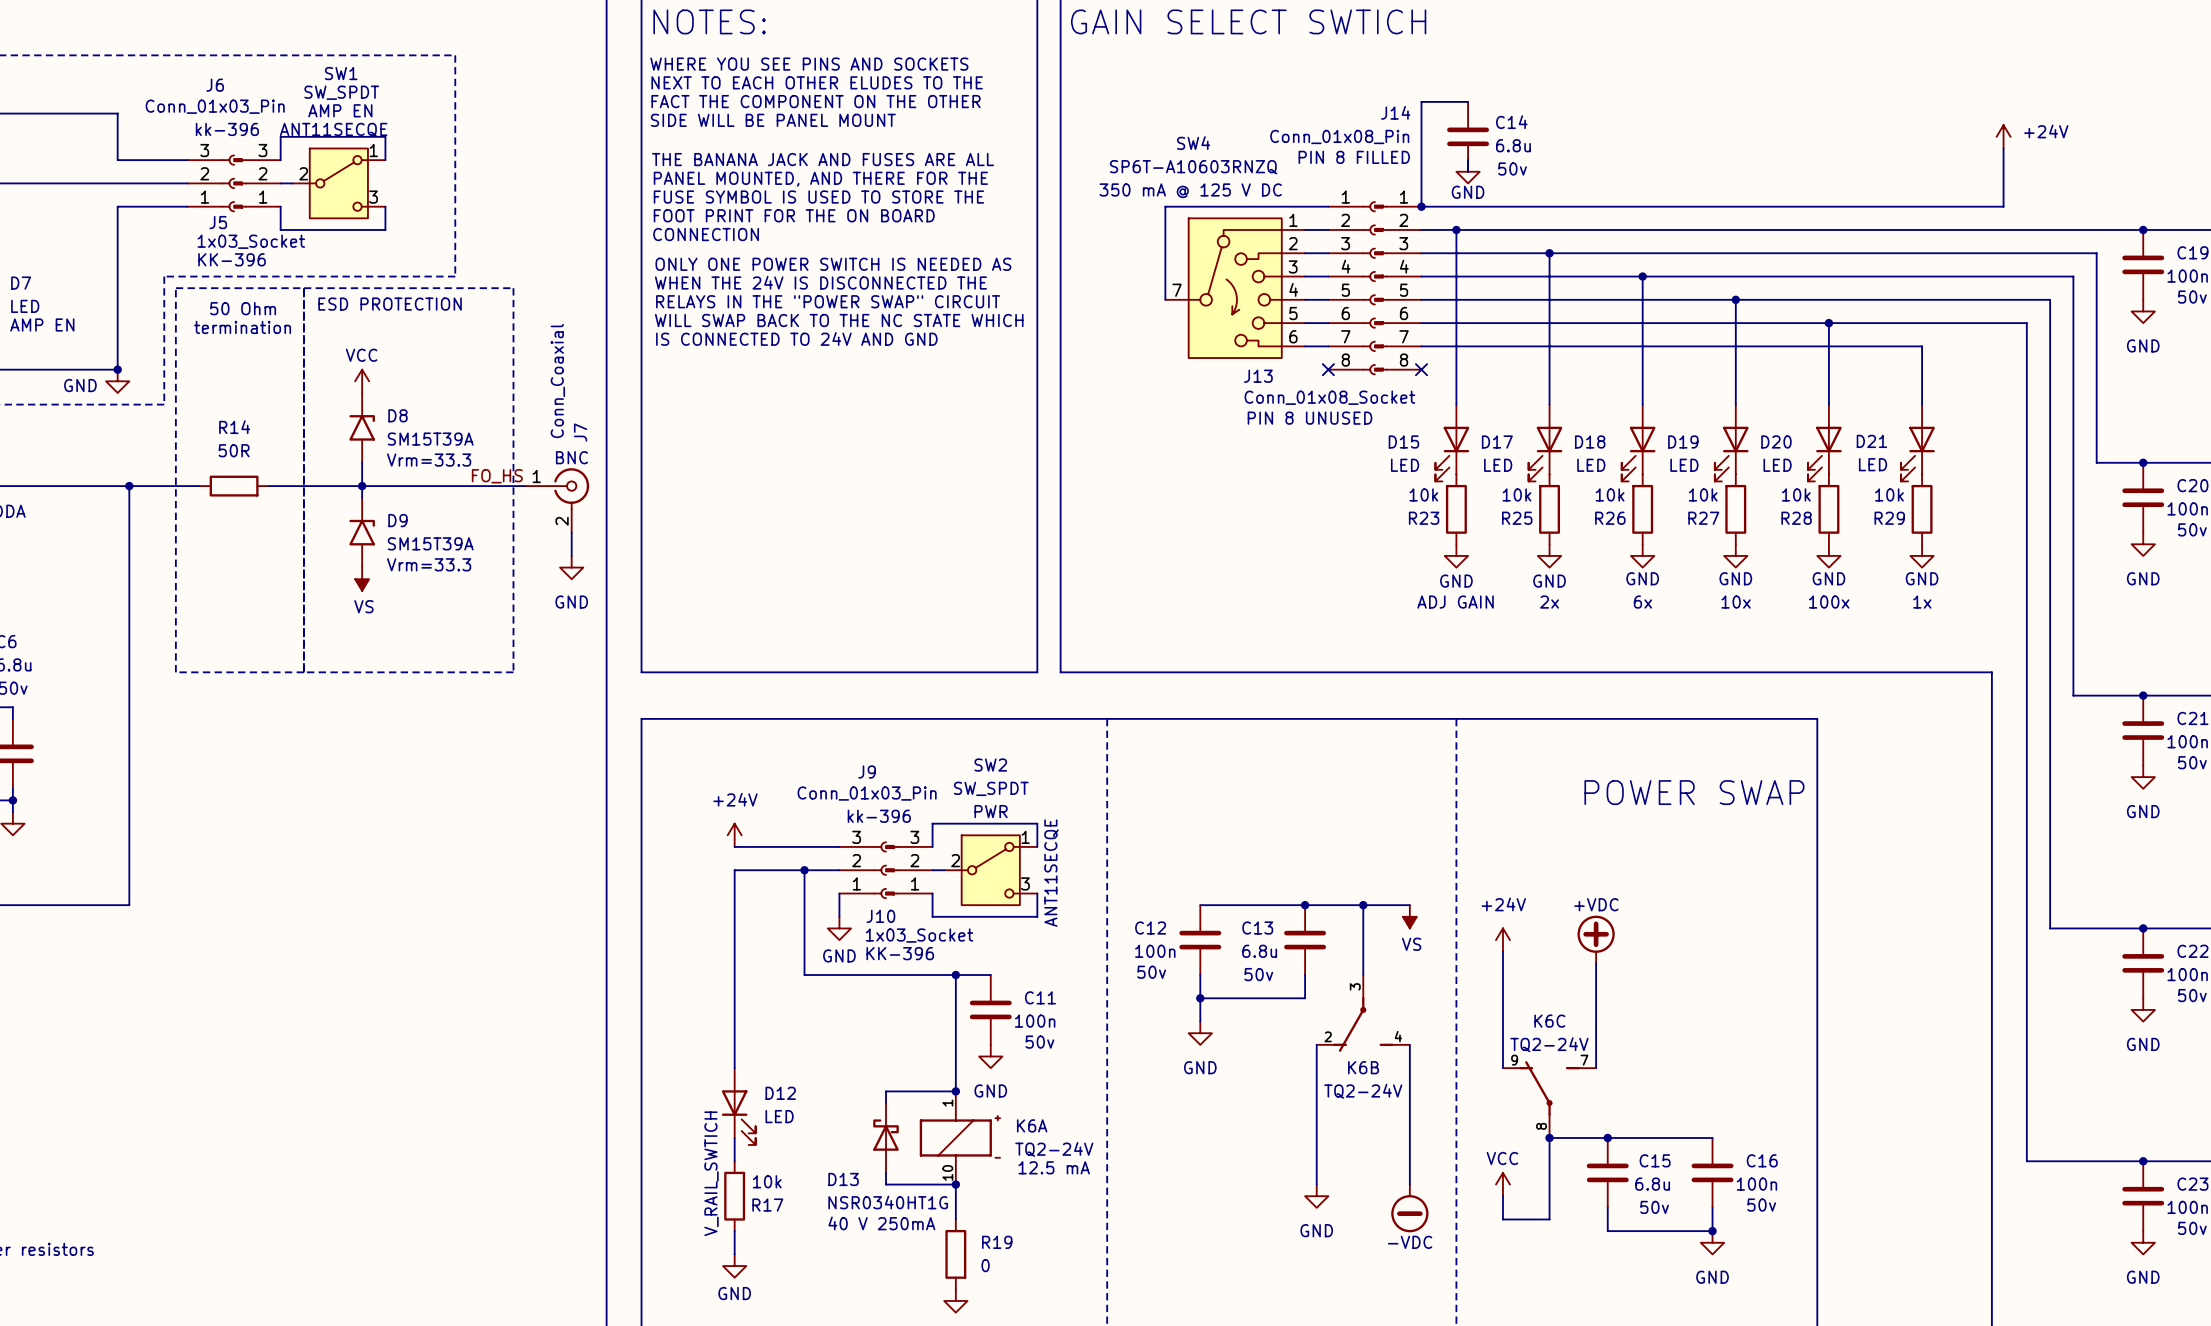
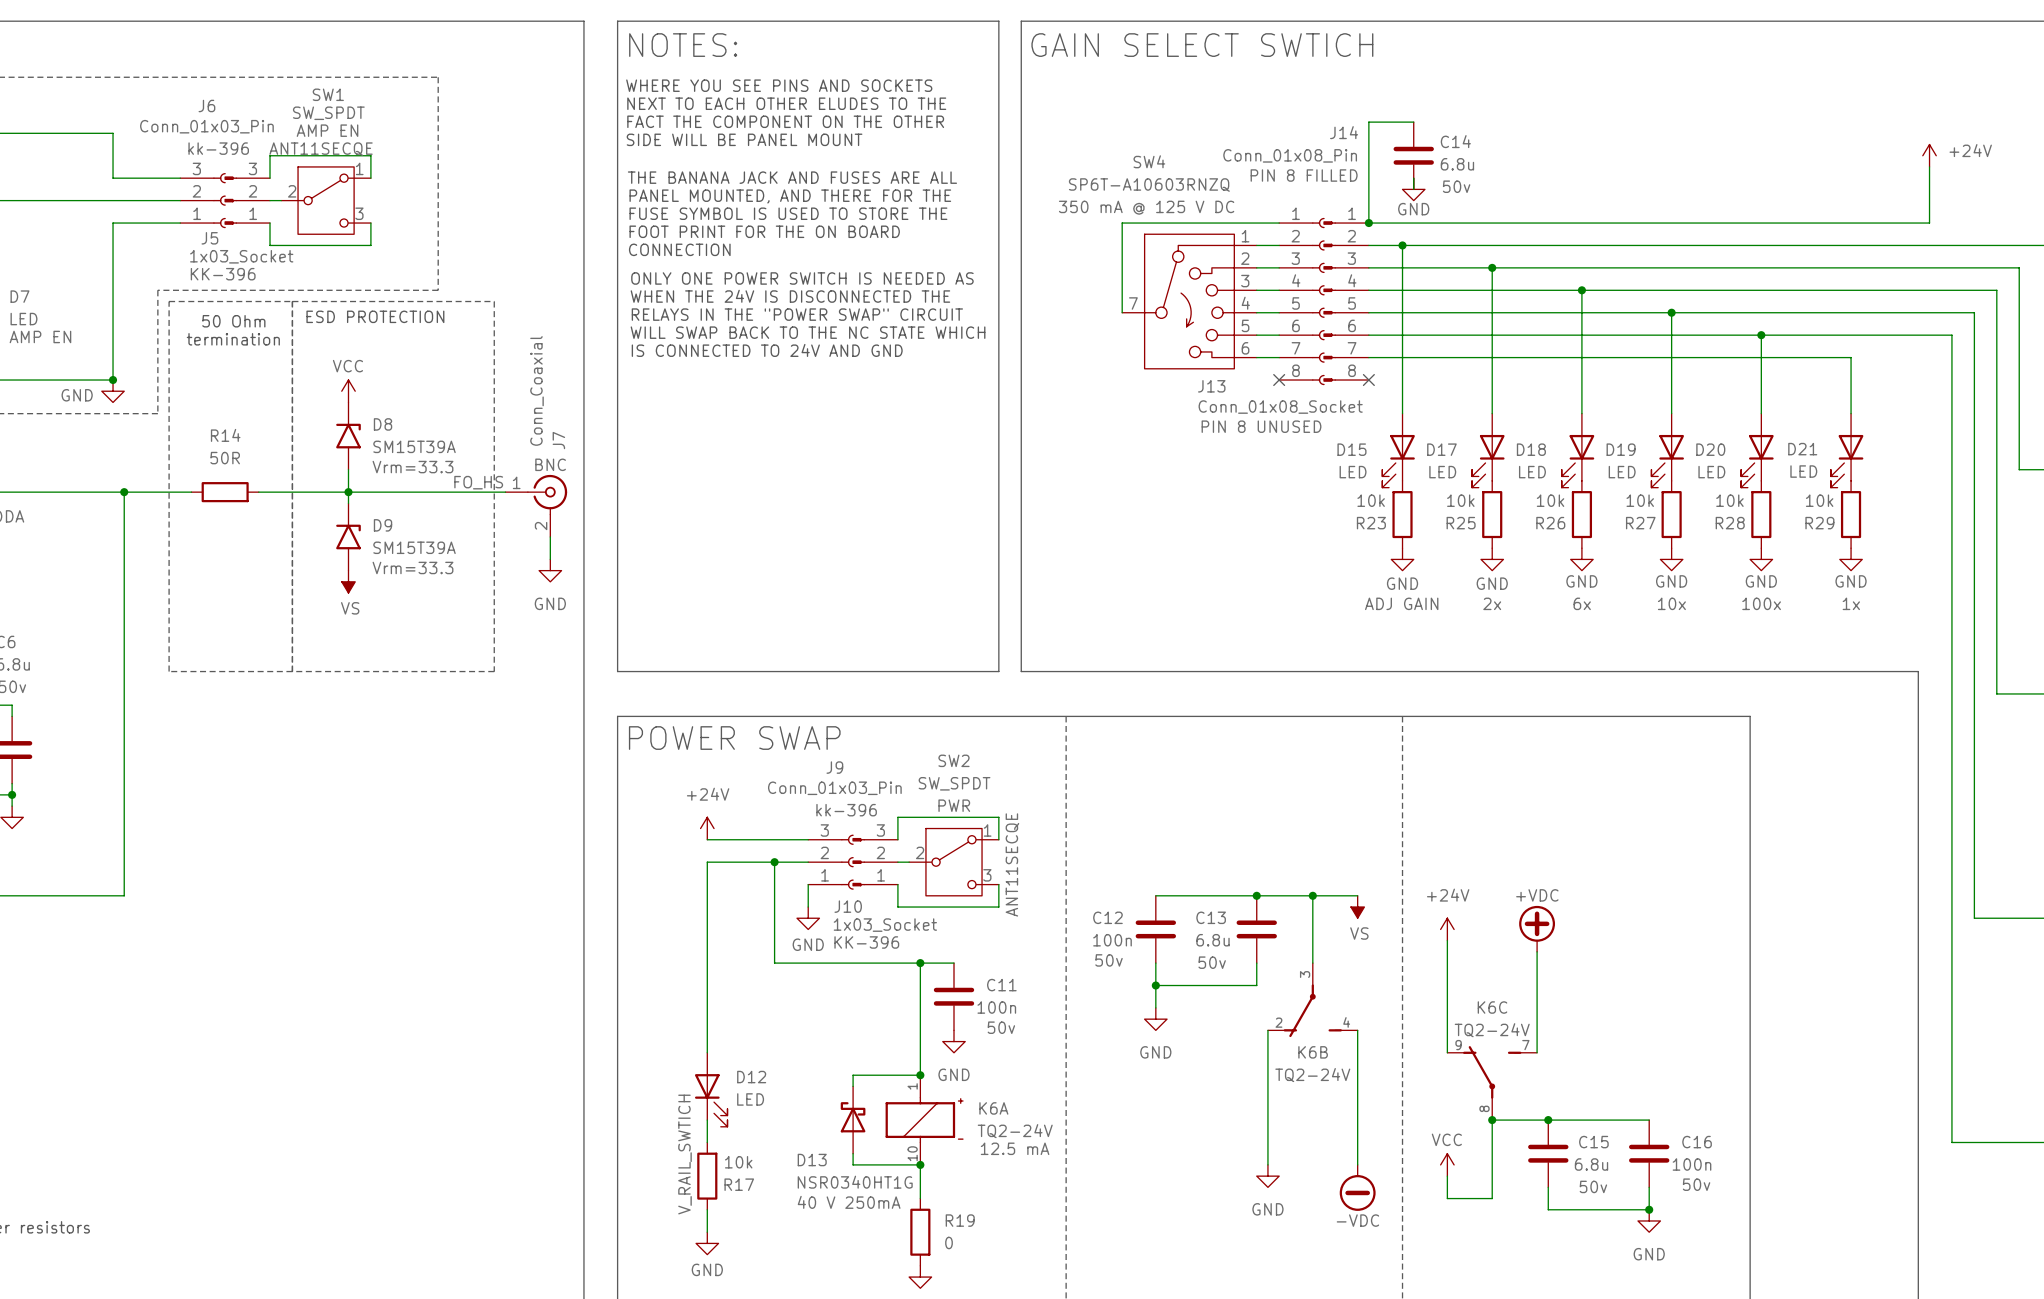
text: none -> POWER SWAP (734, 738)
text: POWER SWAP (1694, 792) -> none

